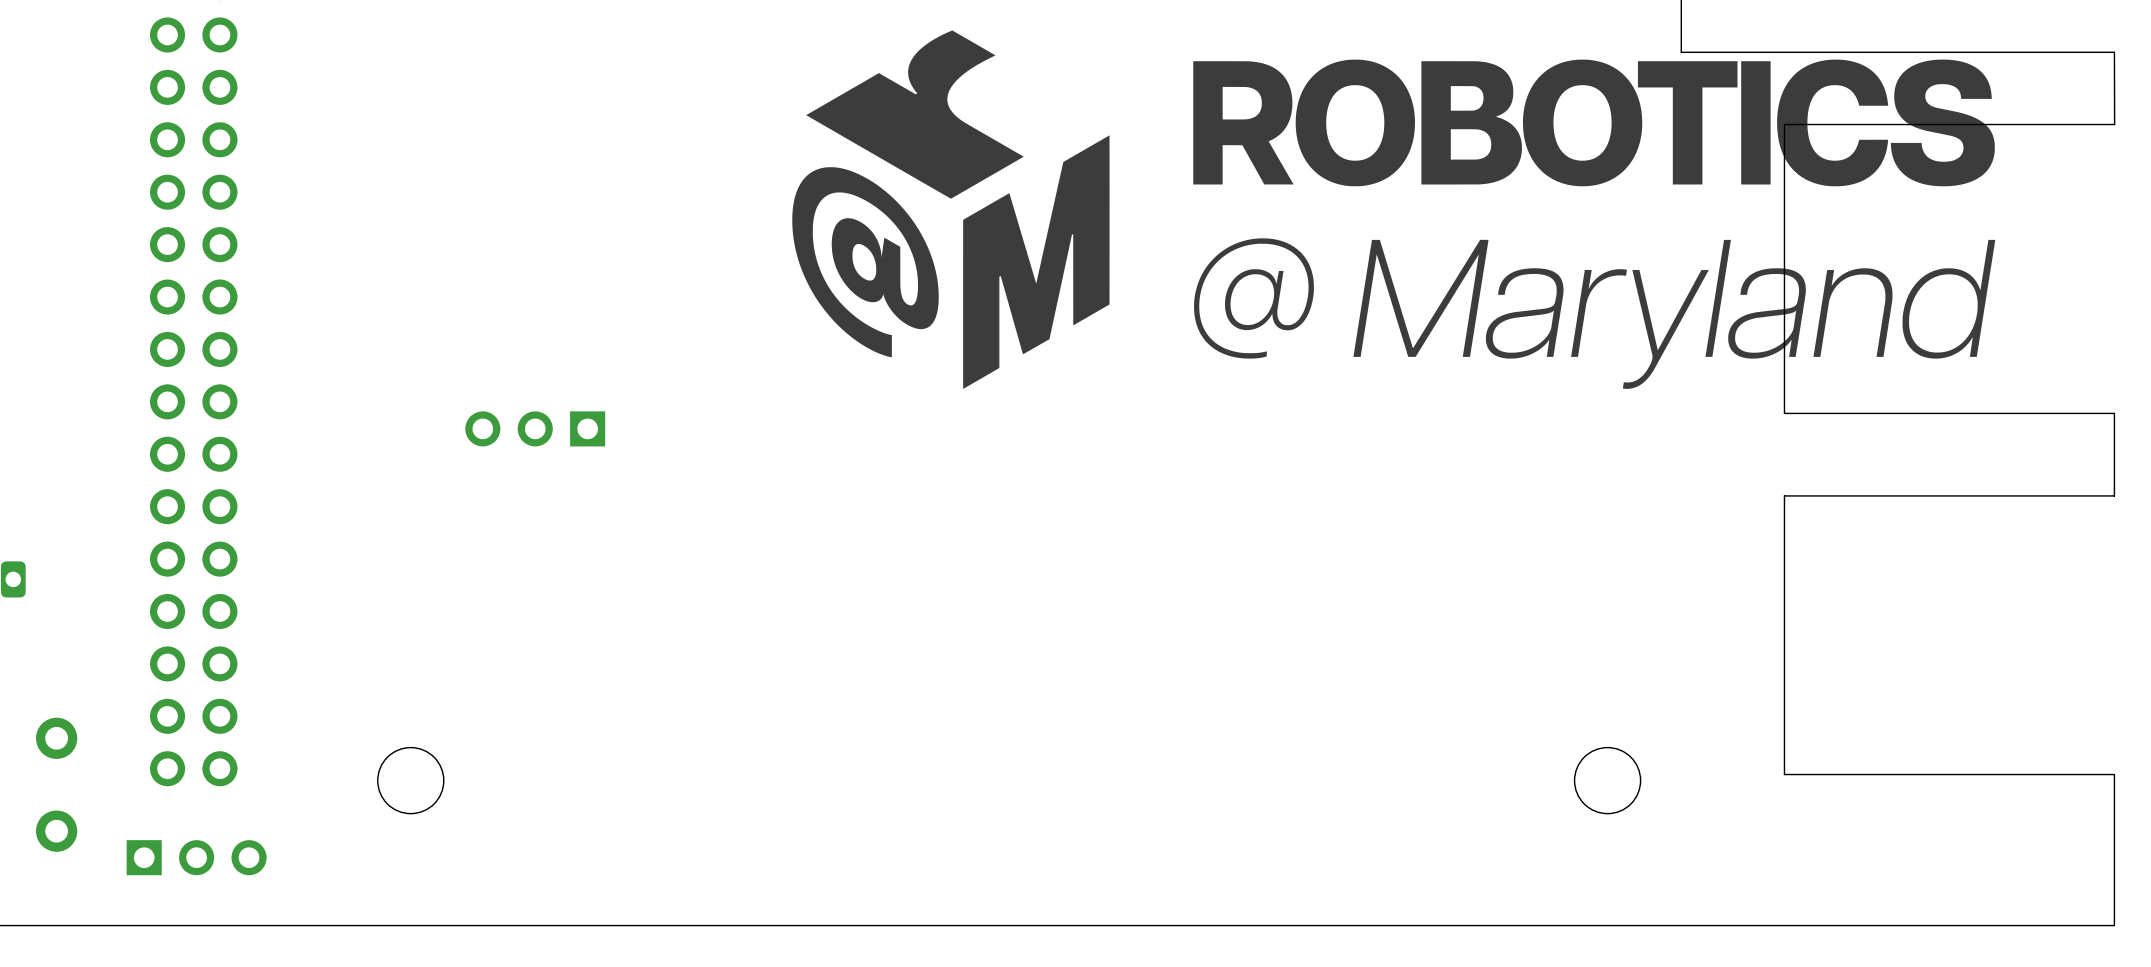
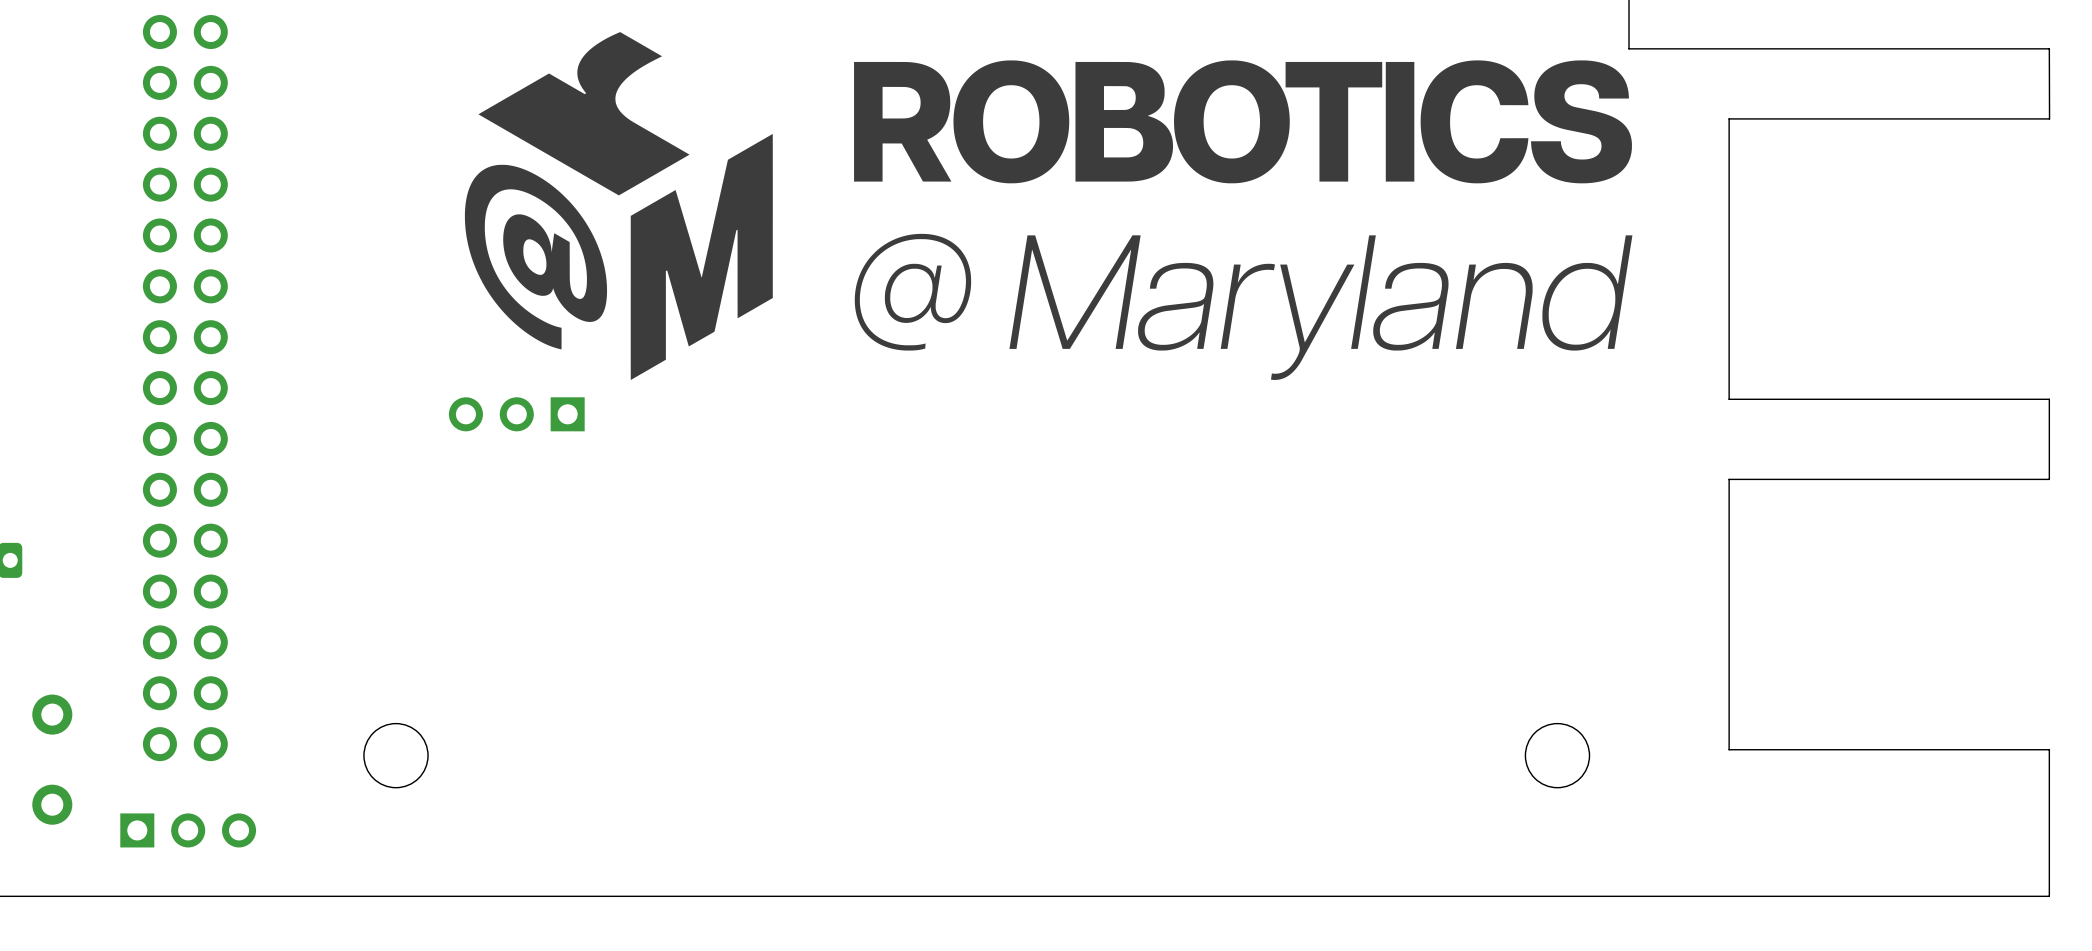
drawing position: (1393, 209) -> (1048, 206)

